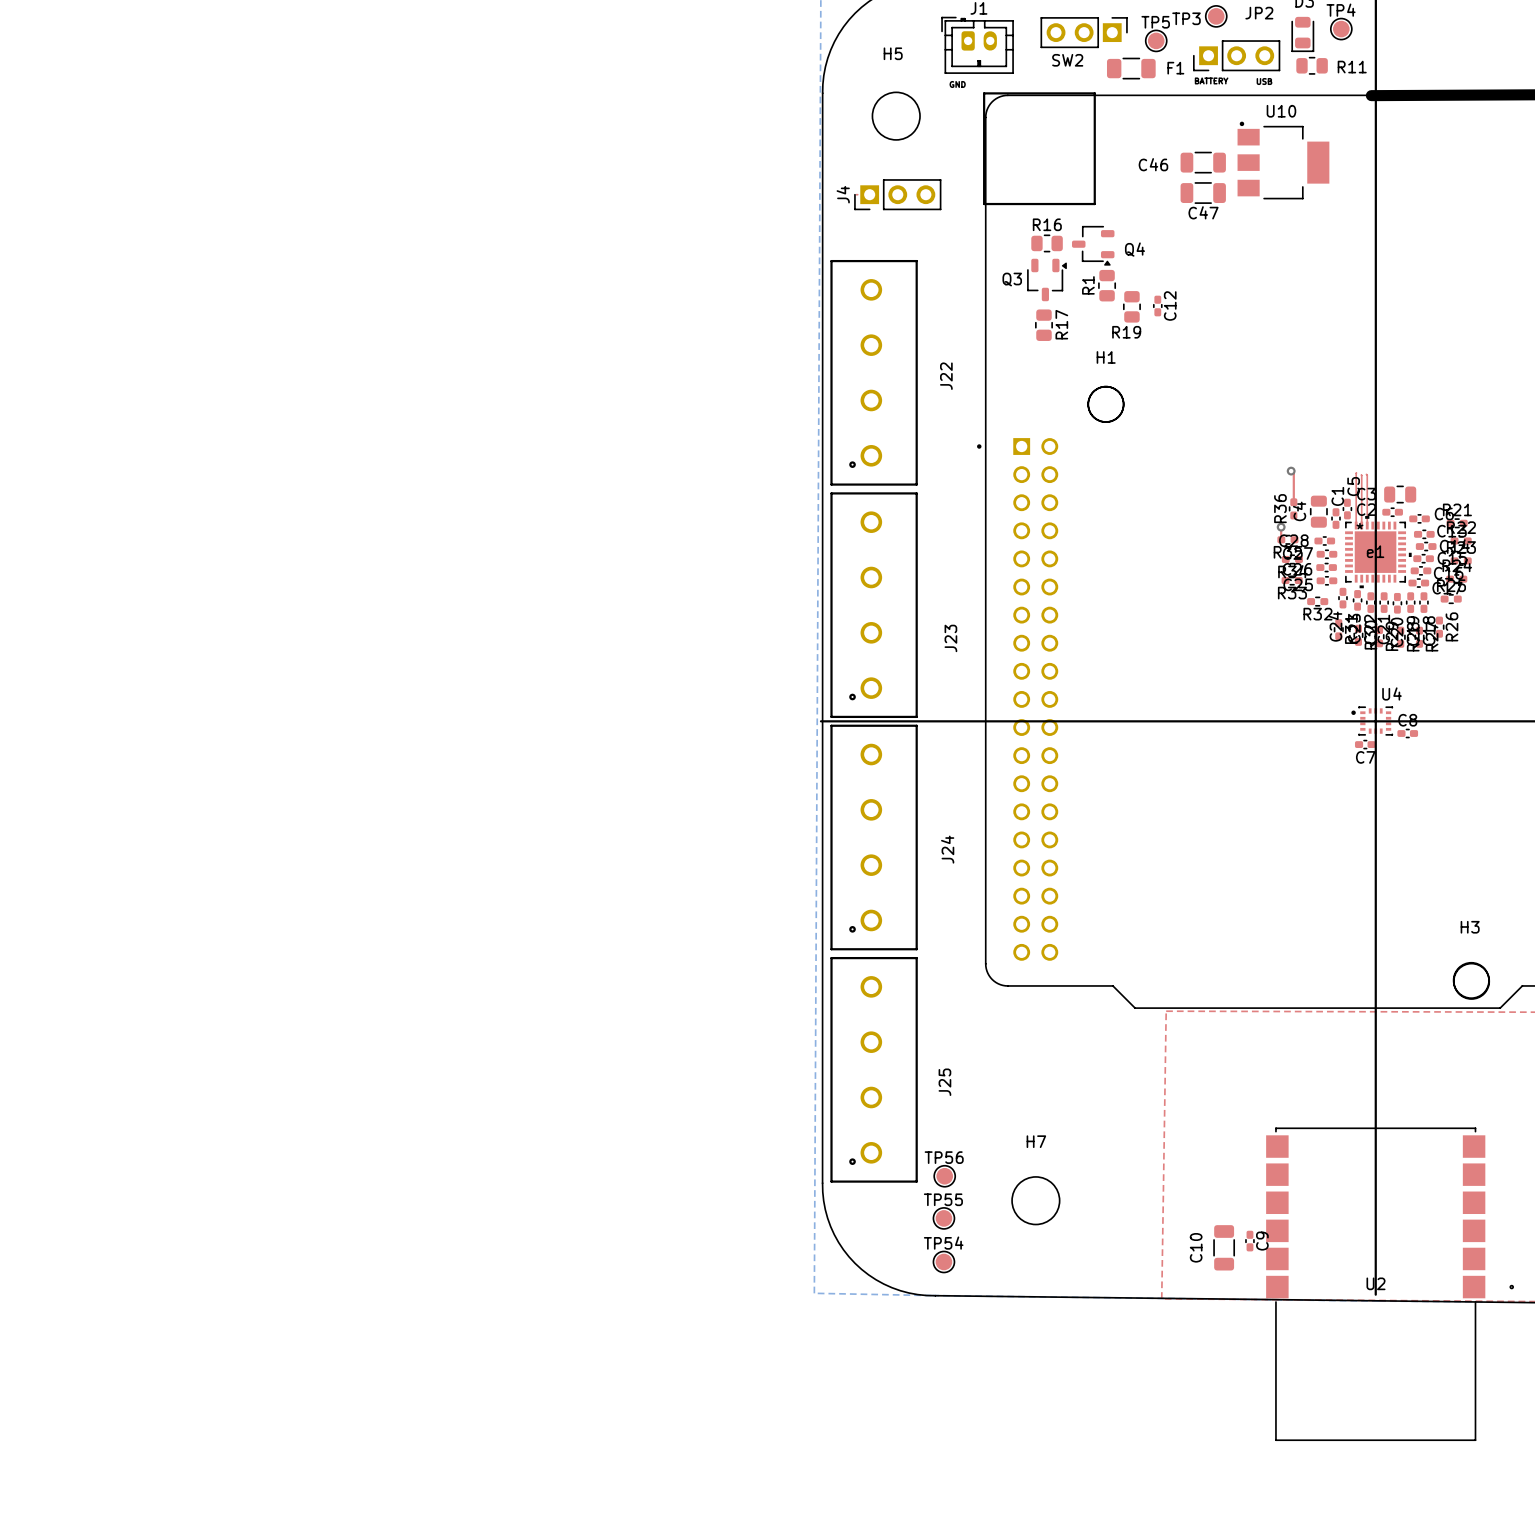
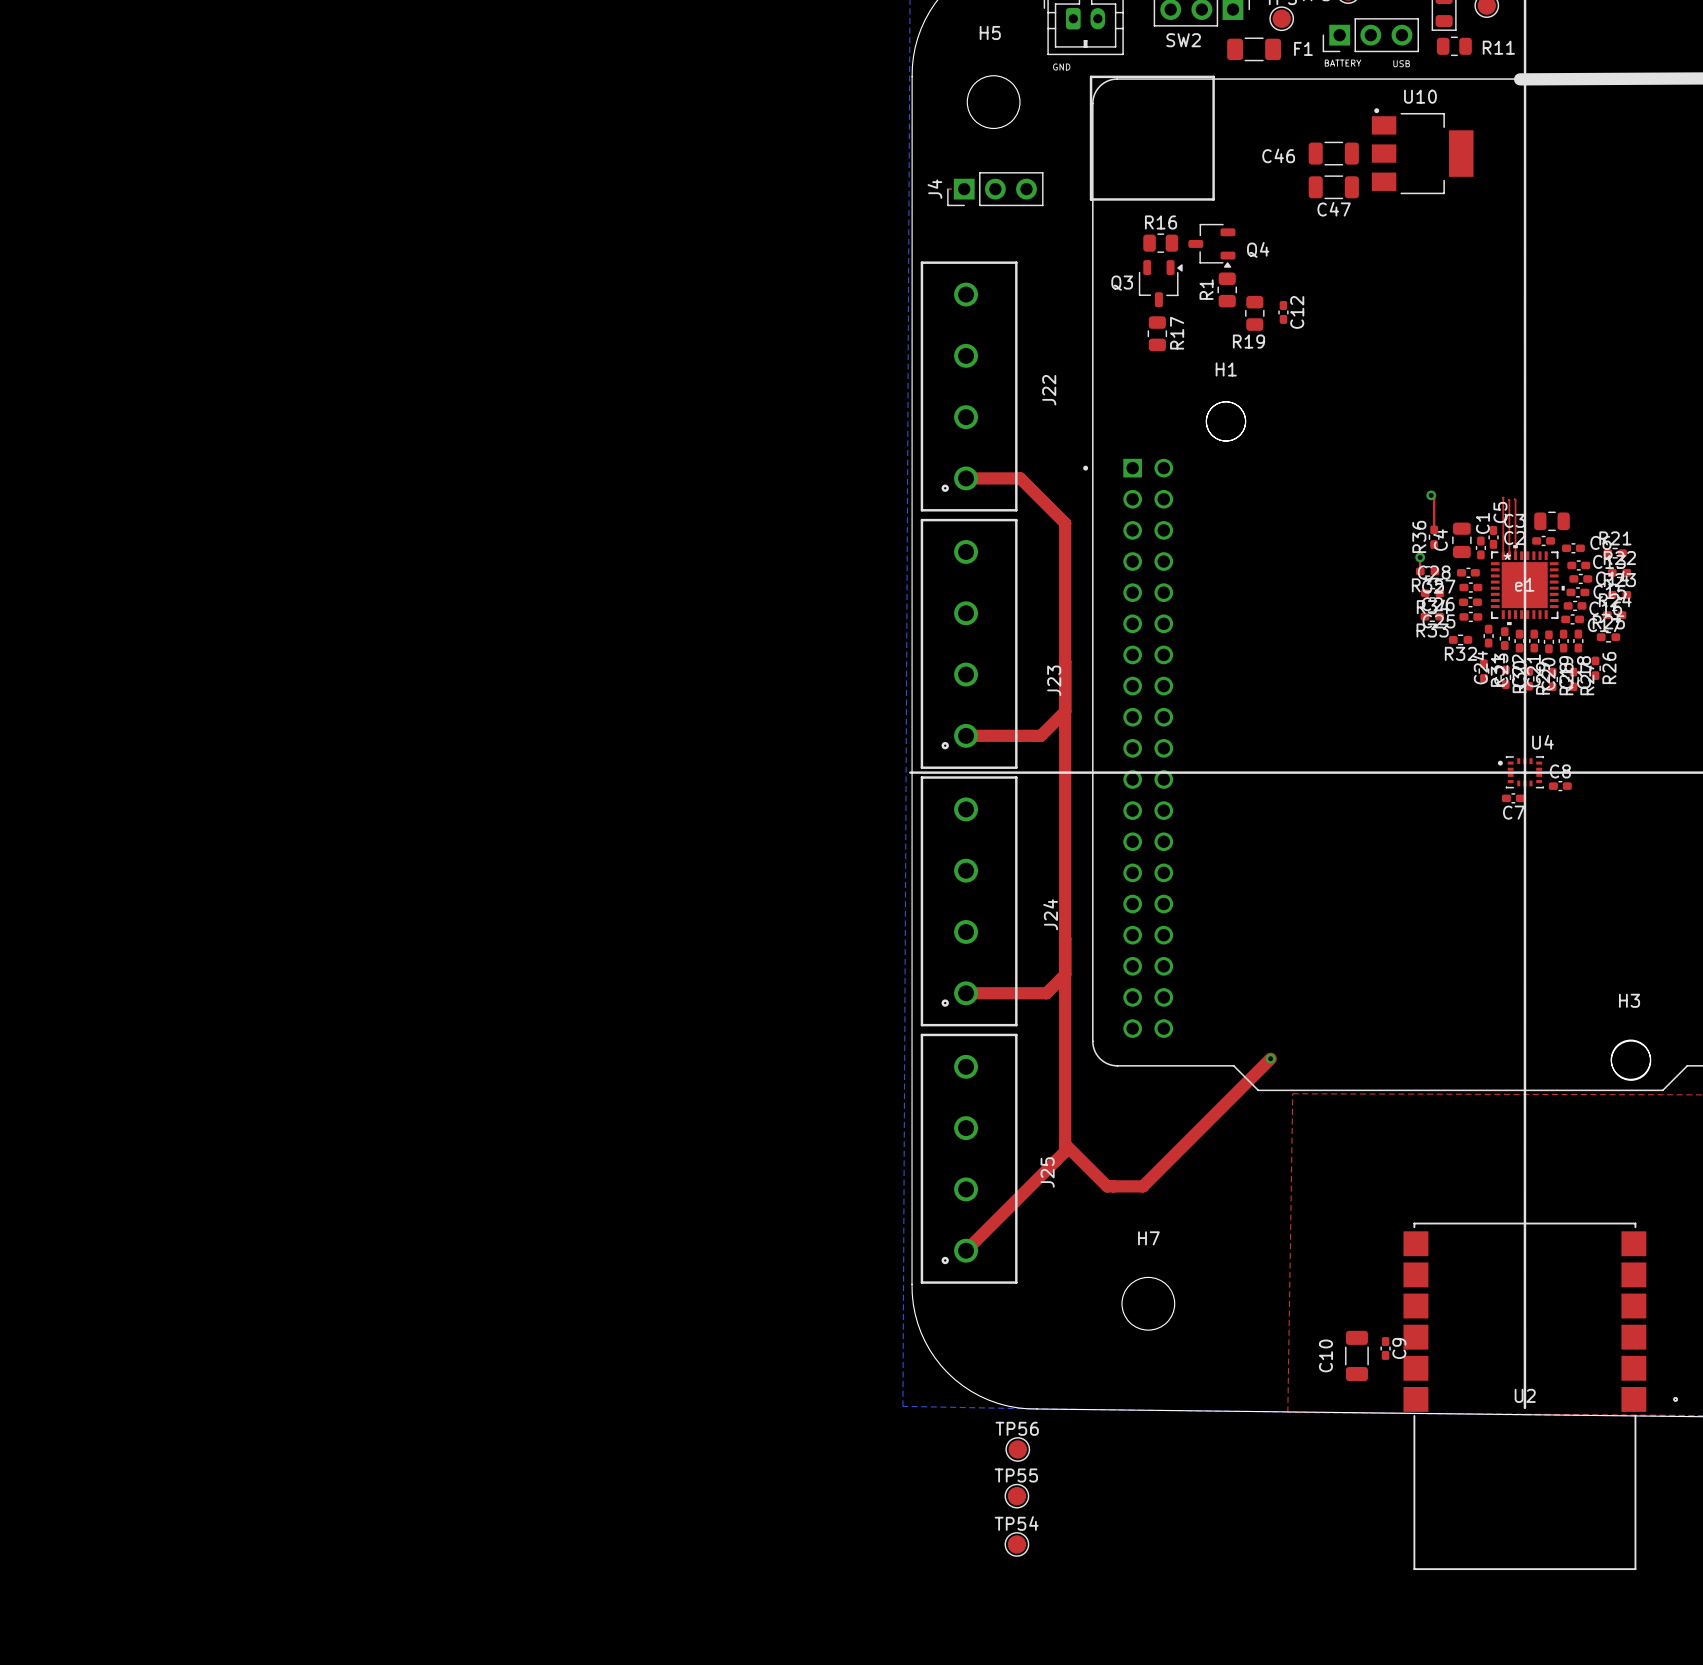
top track: none -> (966, 478) (1020, 478) (1065, 523) (1065, 1151) (966, 1250)
top track: none -> (1065, 711) (1040, 735) (966, 735)
top track: none -> (1065, 974) (1046, 993) (966, 993)
top track: none -> (1270, 1058) (1143, 1186) (1107, 1186) (1065, 1144)
via: none -> (1270, 1058)
TP56 position: (944, 1176) -> (1017, 1449)
TP55 position: (943, 1218) -> (1016, 1496)
TP54 position: (943, 1261) -> (1016, 1544)

